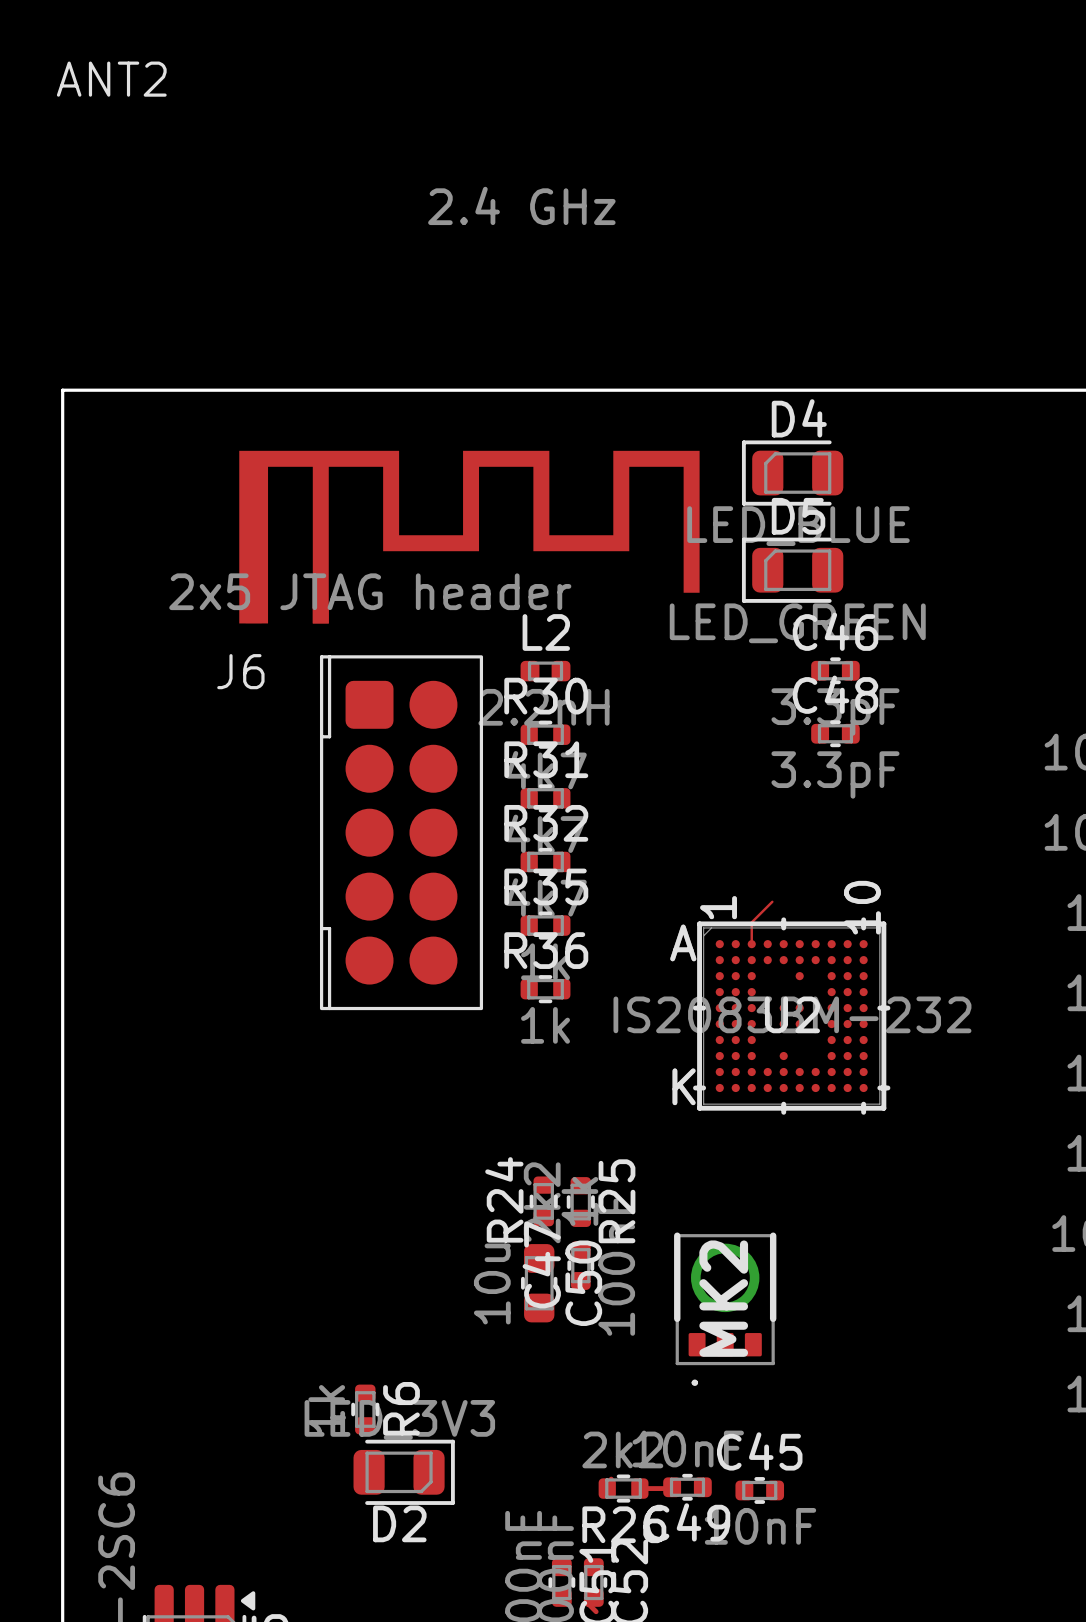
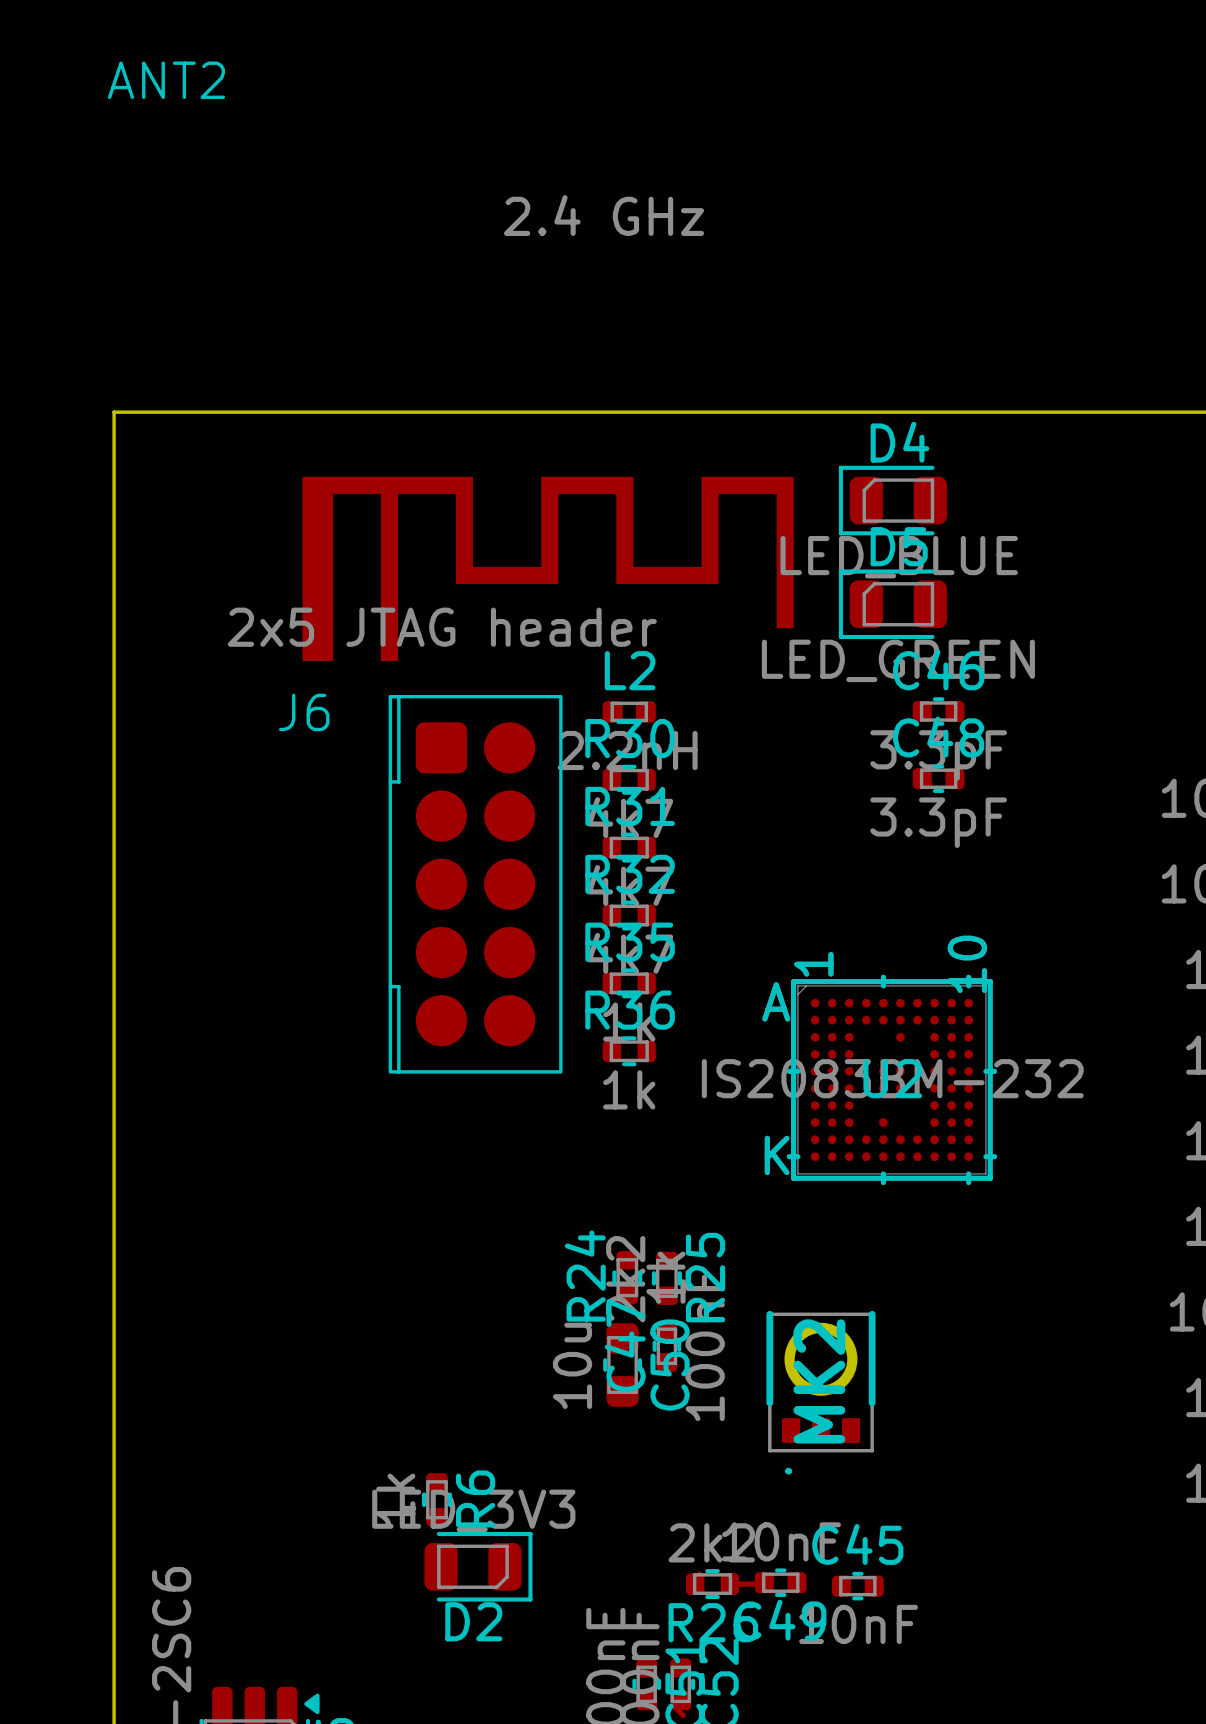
top track: (772, 901) (751, 922) (751, 944) -> none

